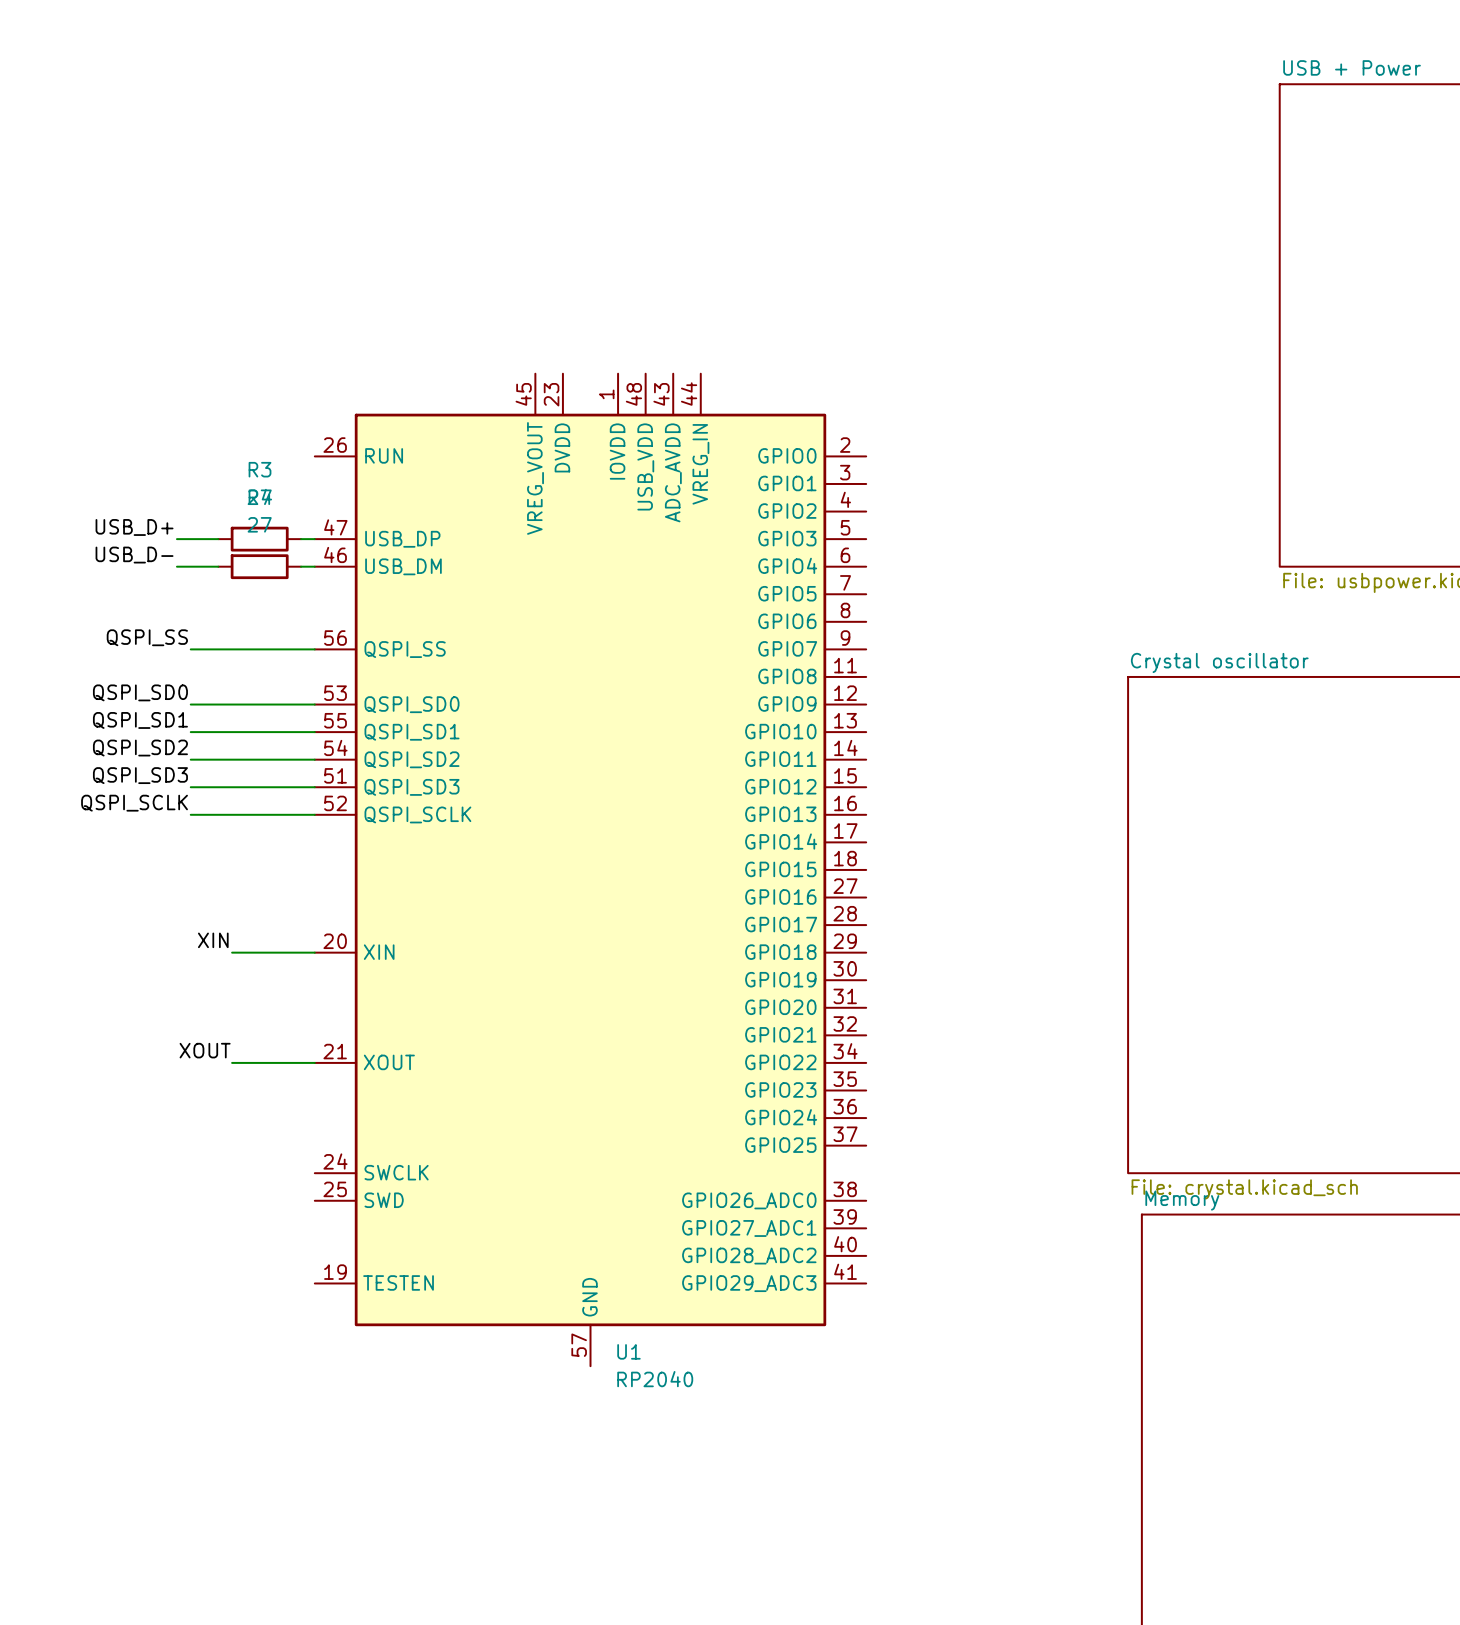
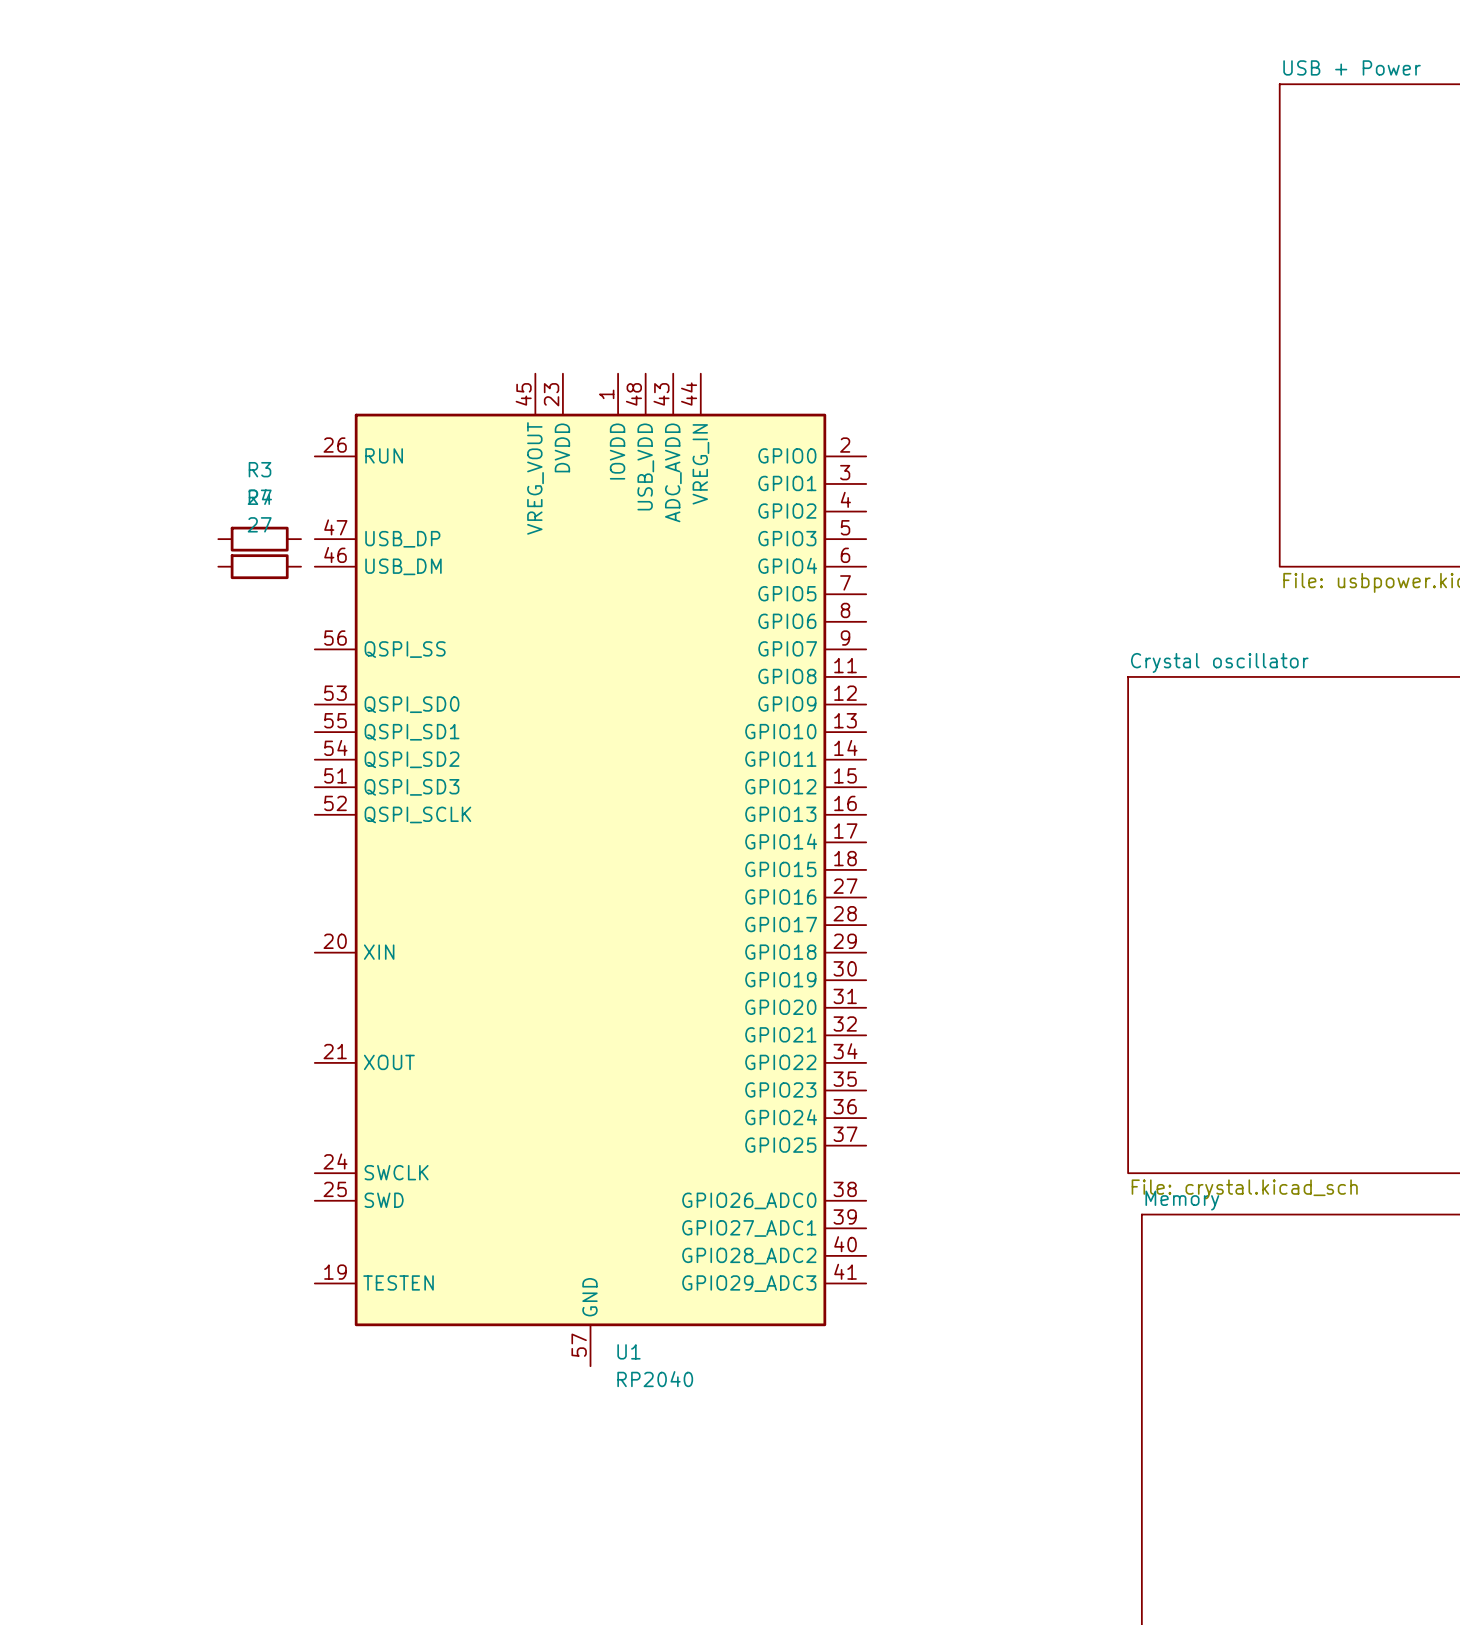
label: USB_D+ (134, 527) -> none
wire: (176, 539) (218, 539) -> none
wire: (301, 539) (314, 539) -> none
label: USB_D- (134, 555) -> none
wire: (176, 566) (218, 566) -> none
wire: (301, 566) (314, 566) -> none
label: QSPI_SS (147, 637) -> none
wire: (190, 649) (314, 649) -> none
label: QSPI_SD0 (140, 692) -> none
wire: (190, 704) (314, 704) -> none
label: QSPI_SD1 (140, 720) -> none
wire: (190, 732) (314, 732) -> none
label: QSPI_SD2 (140, 748) -> none
wire: (190, 759) (314, 759) -> none
label: QSPI_SD3 (140, 775) -> none
wire: (190, 787) (314, 787) -> none
label: QSPI_SCLK (134, 803) -> none
wire: (190, 814) (314, 814) -> none
label: XIN (213, 940) -> none
wire: (232, 952) (314, 952) -> none
label: XOUT (205, 1050) -> none
wire: (232, 1062) (314, 1062) -> none

